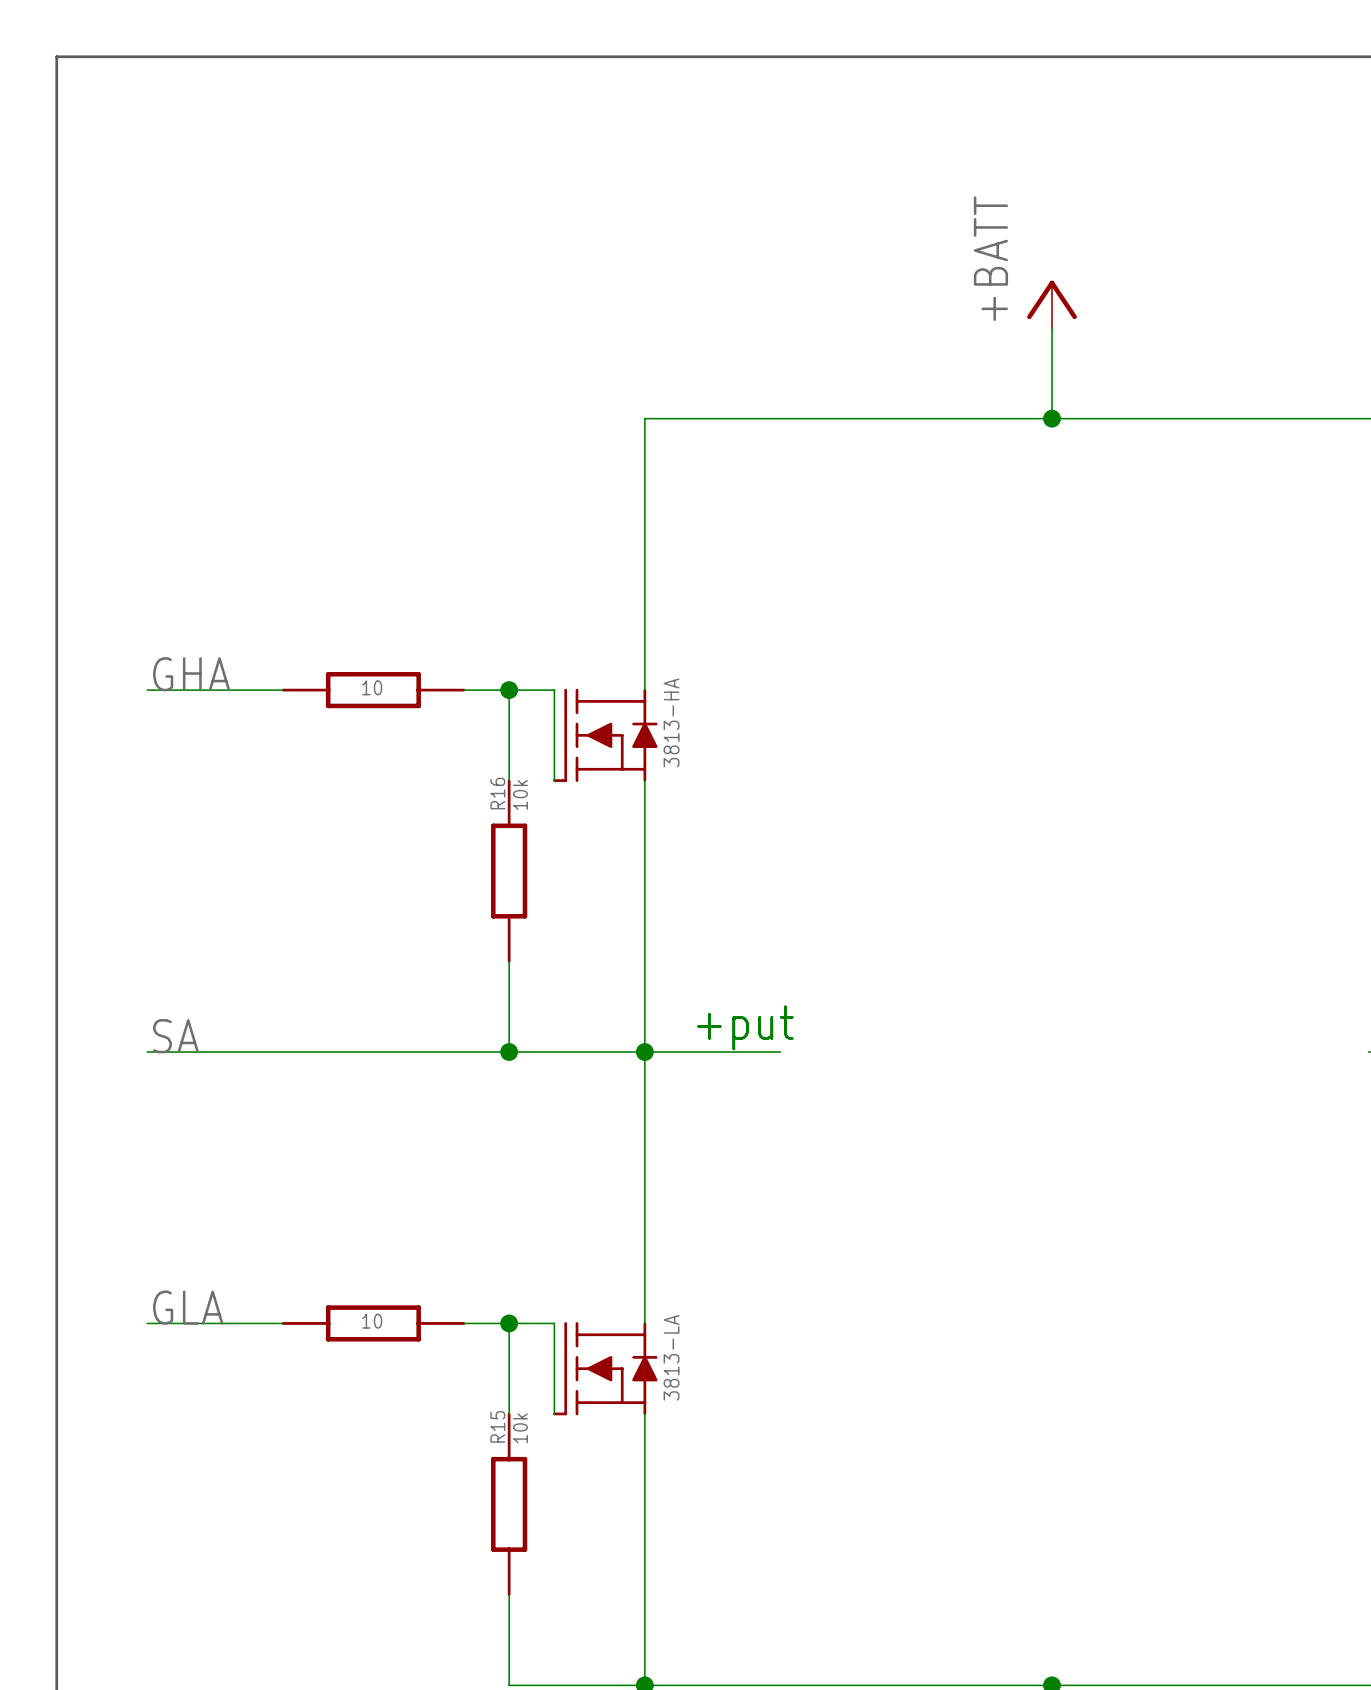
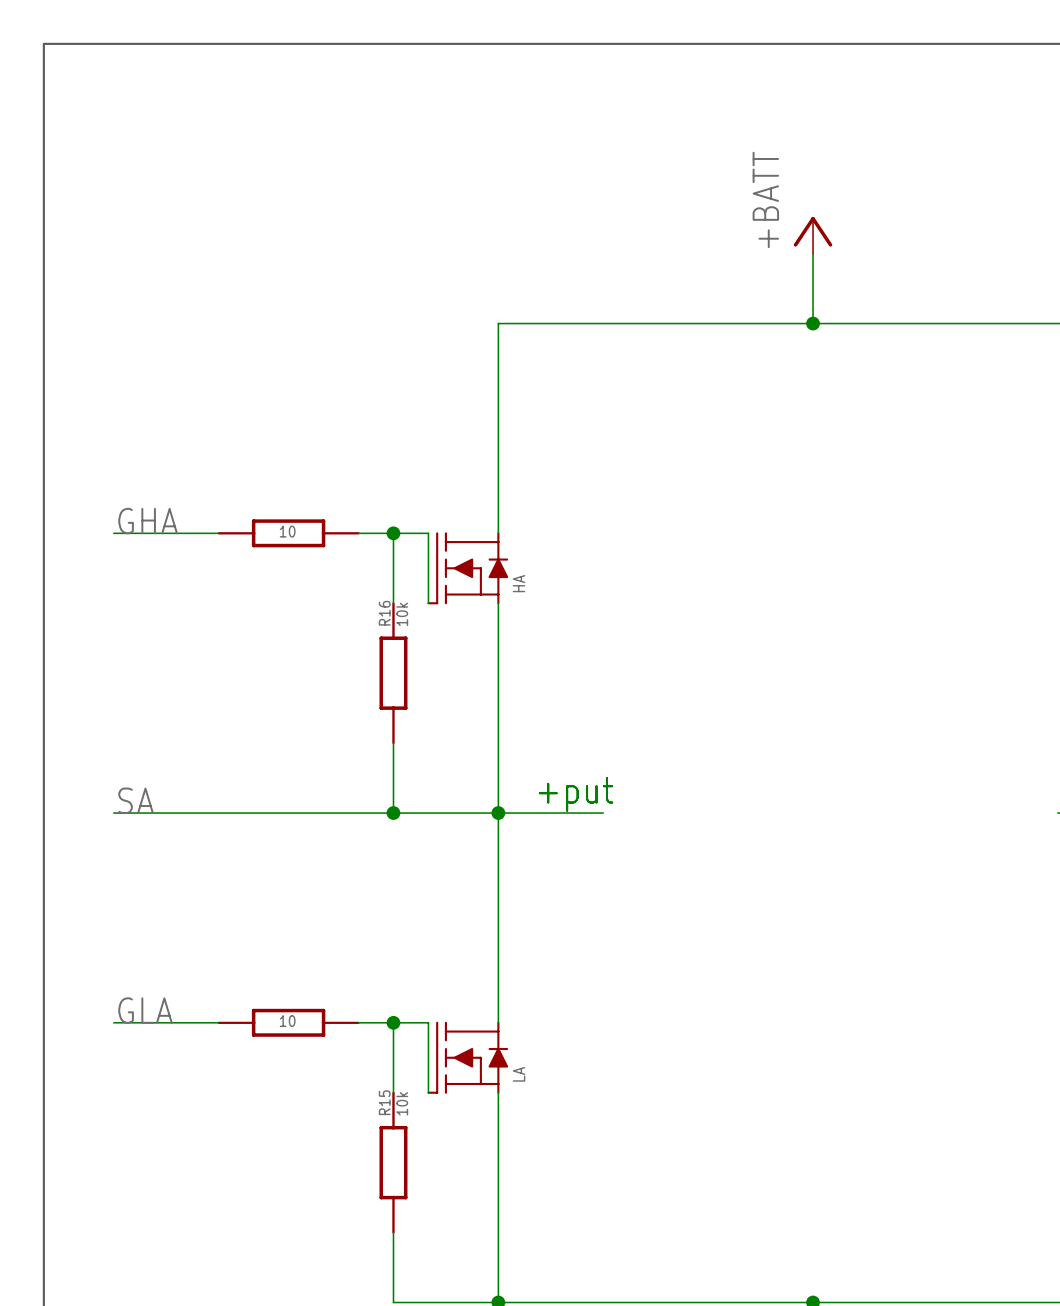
3813-HA name: 3813-HA (671, 722) -> HA (519, 583)
3813-LA name: 3813-LA (671, 1357) -> LA (519, 1074)

